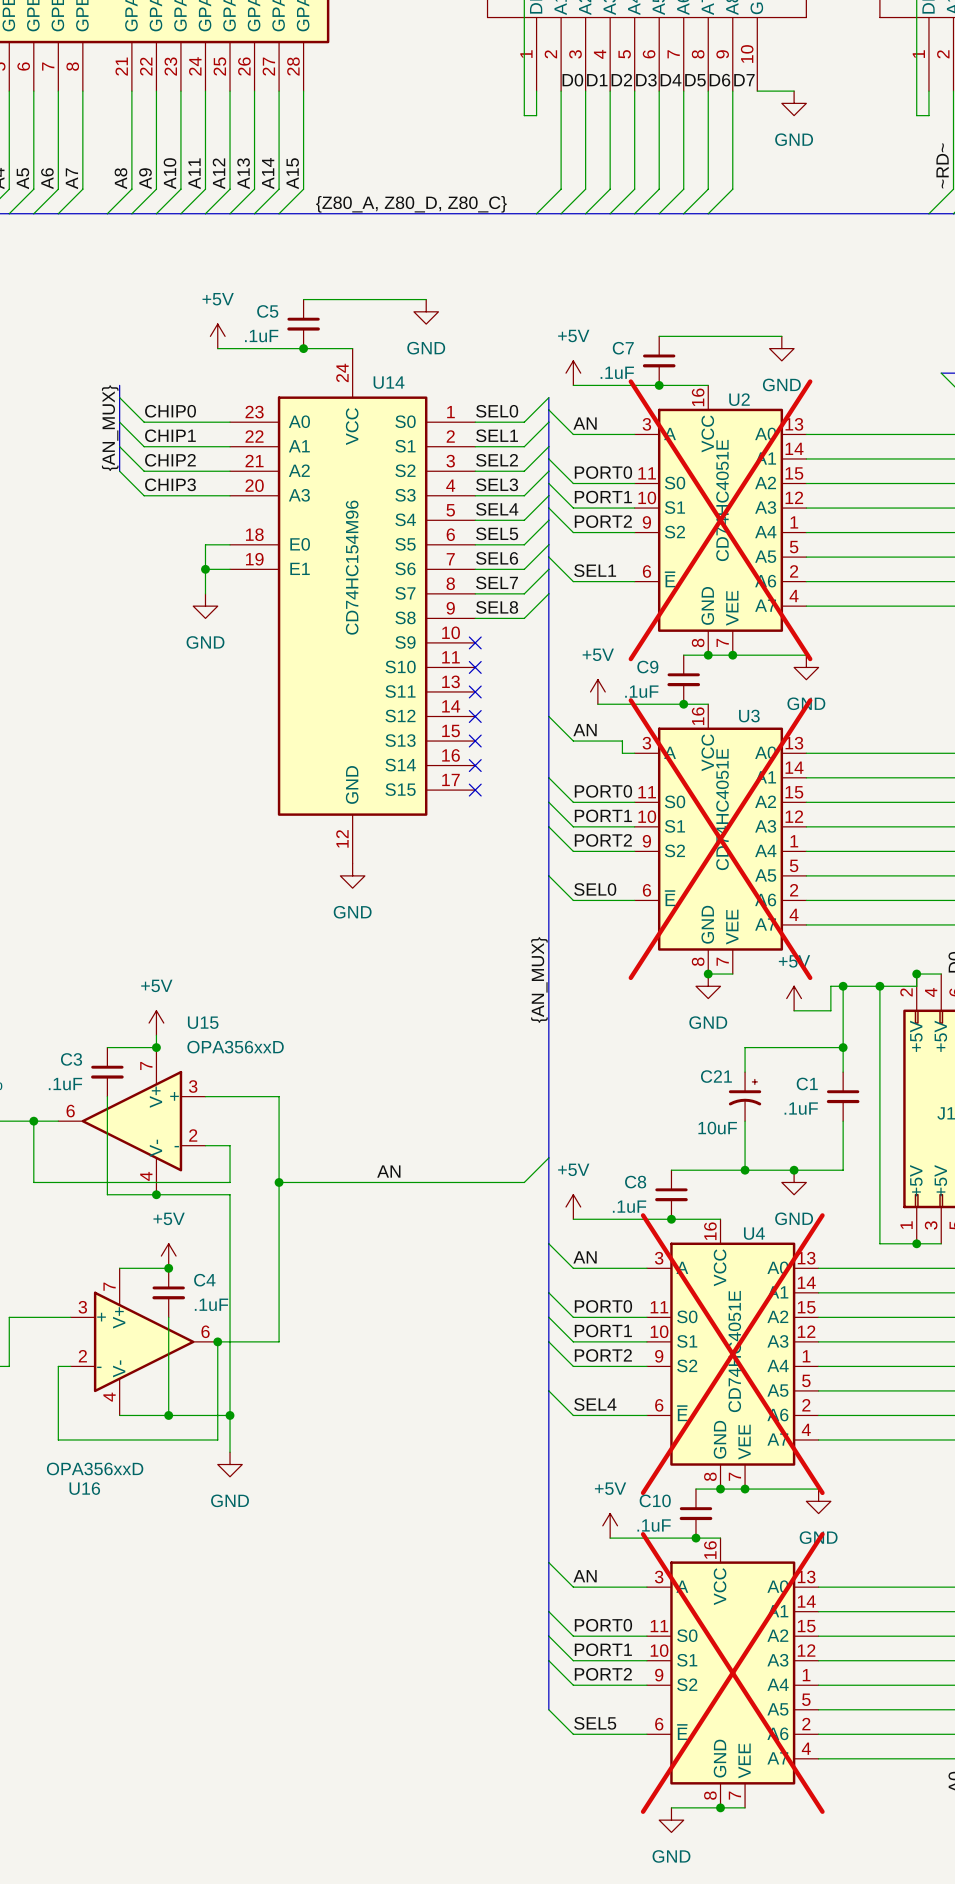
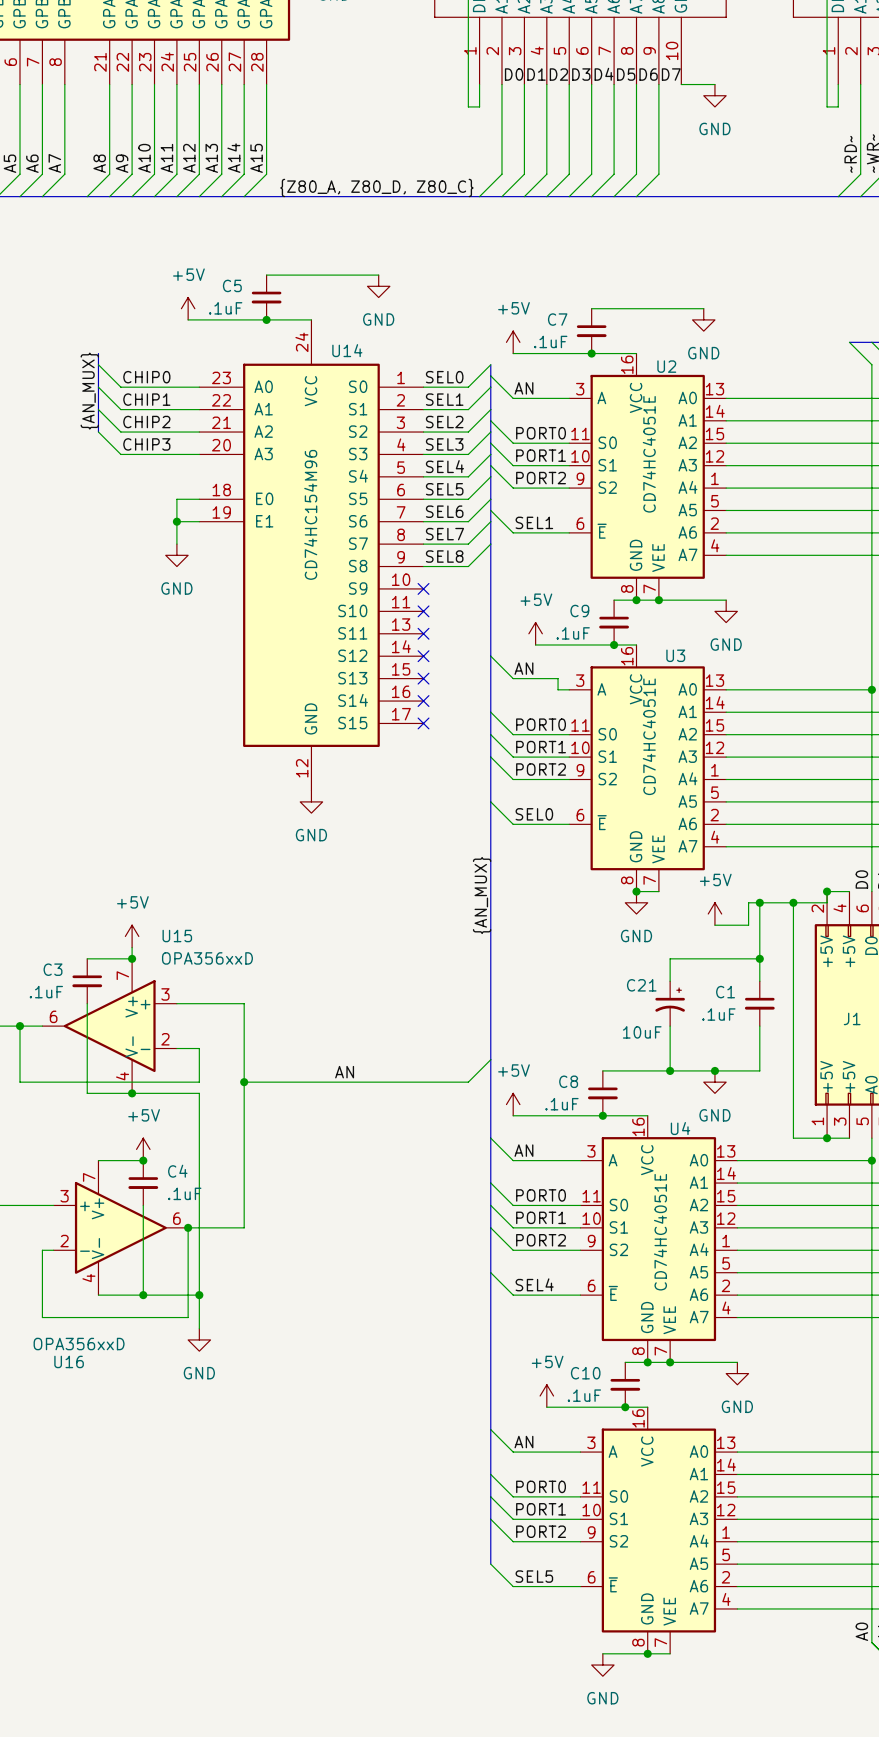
U2 do-not-place cross: (720, 520) -> none
U3 do-not-place cross: (720, 839) -> none
U4 do-not-place cross: (732, 1354) -> none
part do-not-place cross: (732, 1672) -> none

